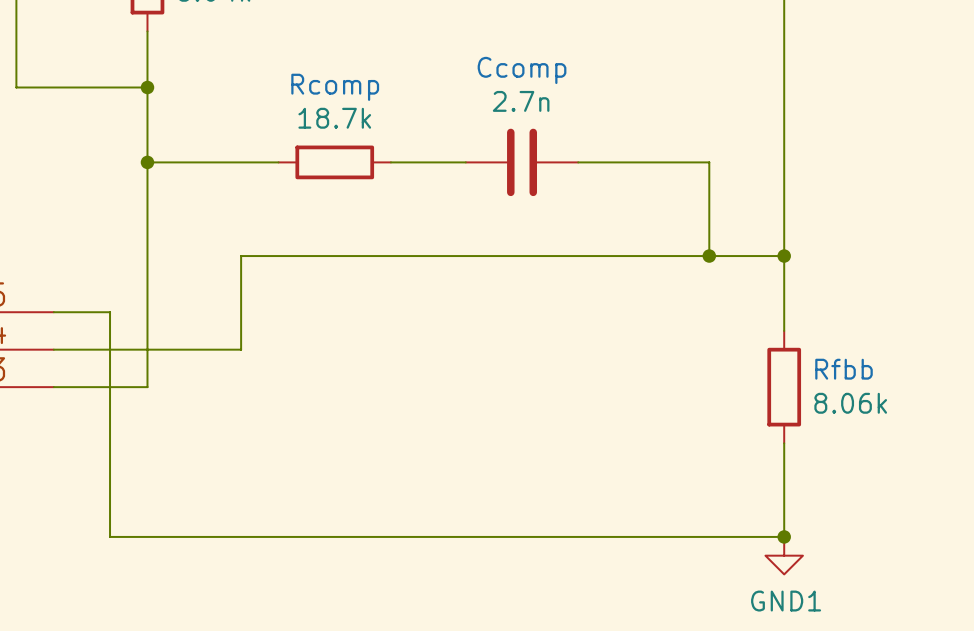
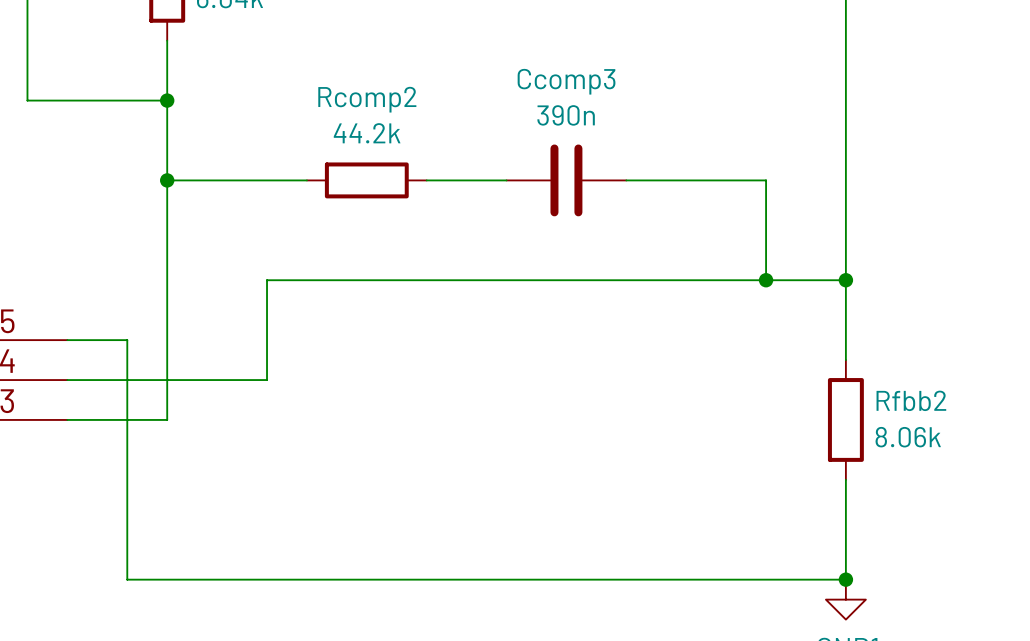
Ccomp name: Ccomp (522, 70) -> Ccomp3 (566, 81)
Rcomp name: Rcomp (335, 87) -> Rcomp2 (367, 99)
Ccomp value: 2.7n (521, 101) -> 390n (566, 115)
Rcomp value: 18.7k (334, 118) -> 44.2k (367, 133)
Rfbb name: Rfbb (844, 369) -> Rfbb2 (911, 400)

